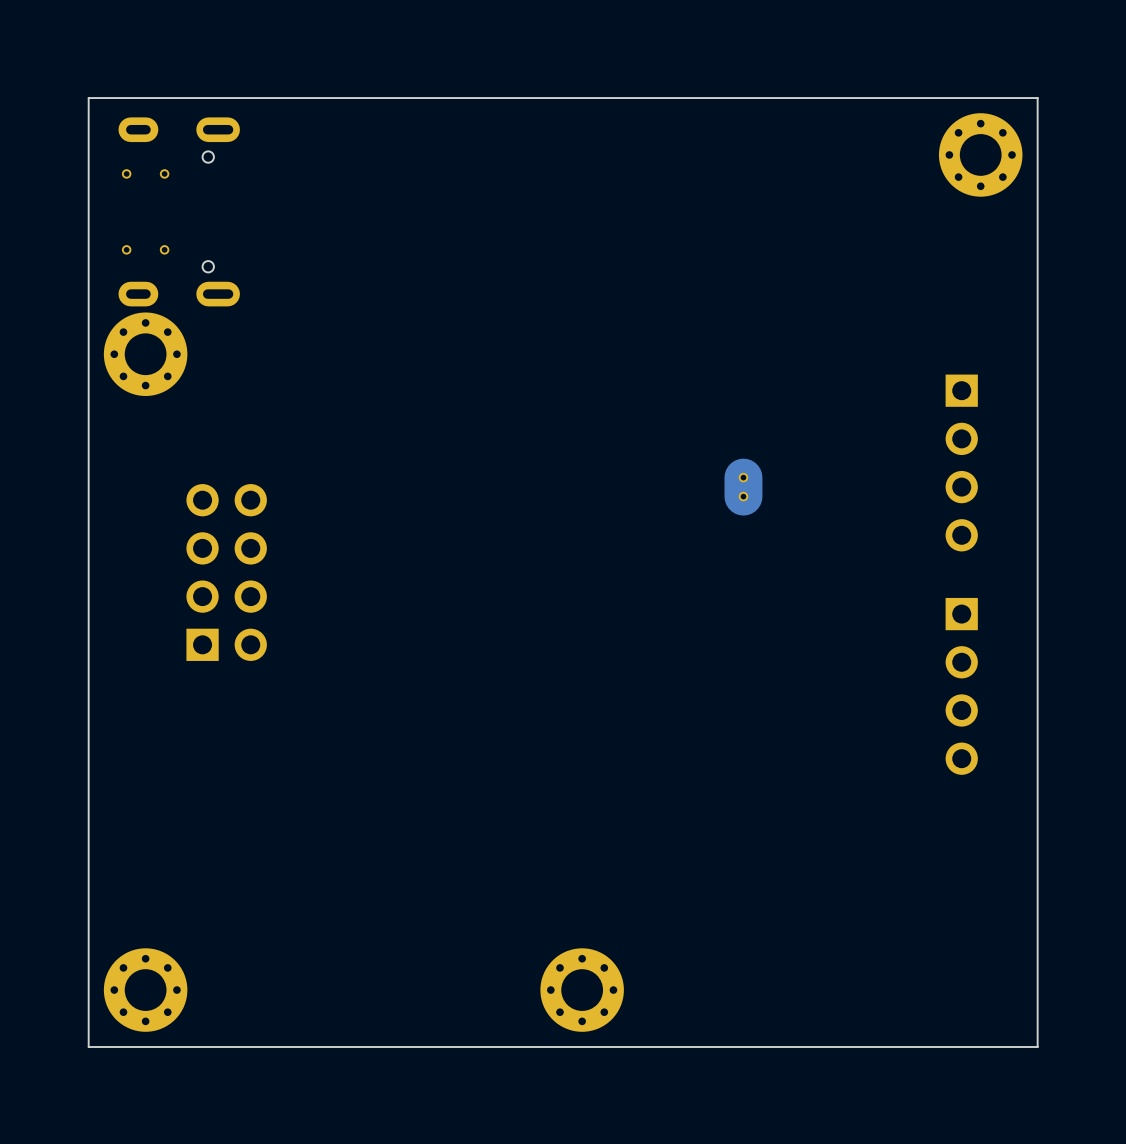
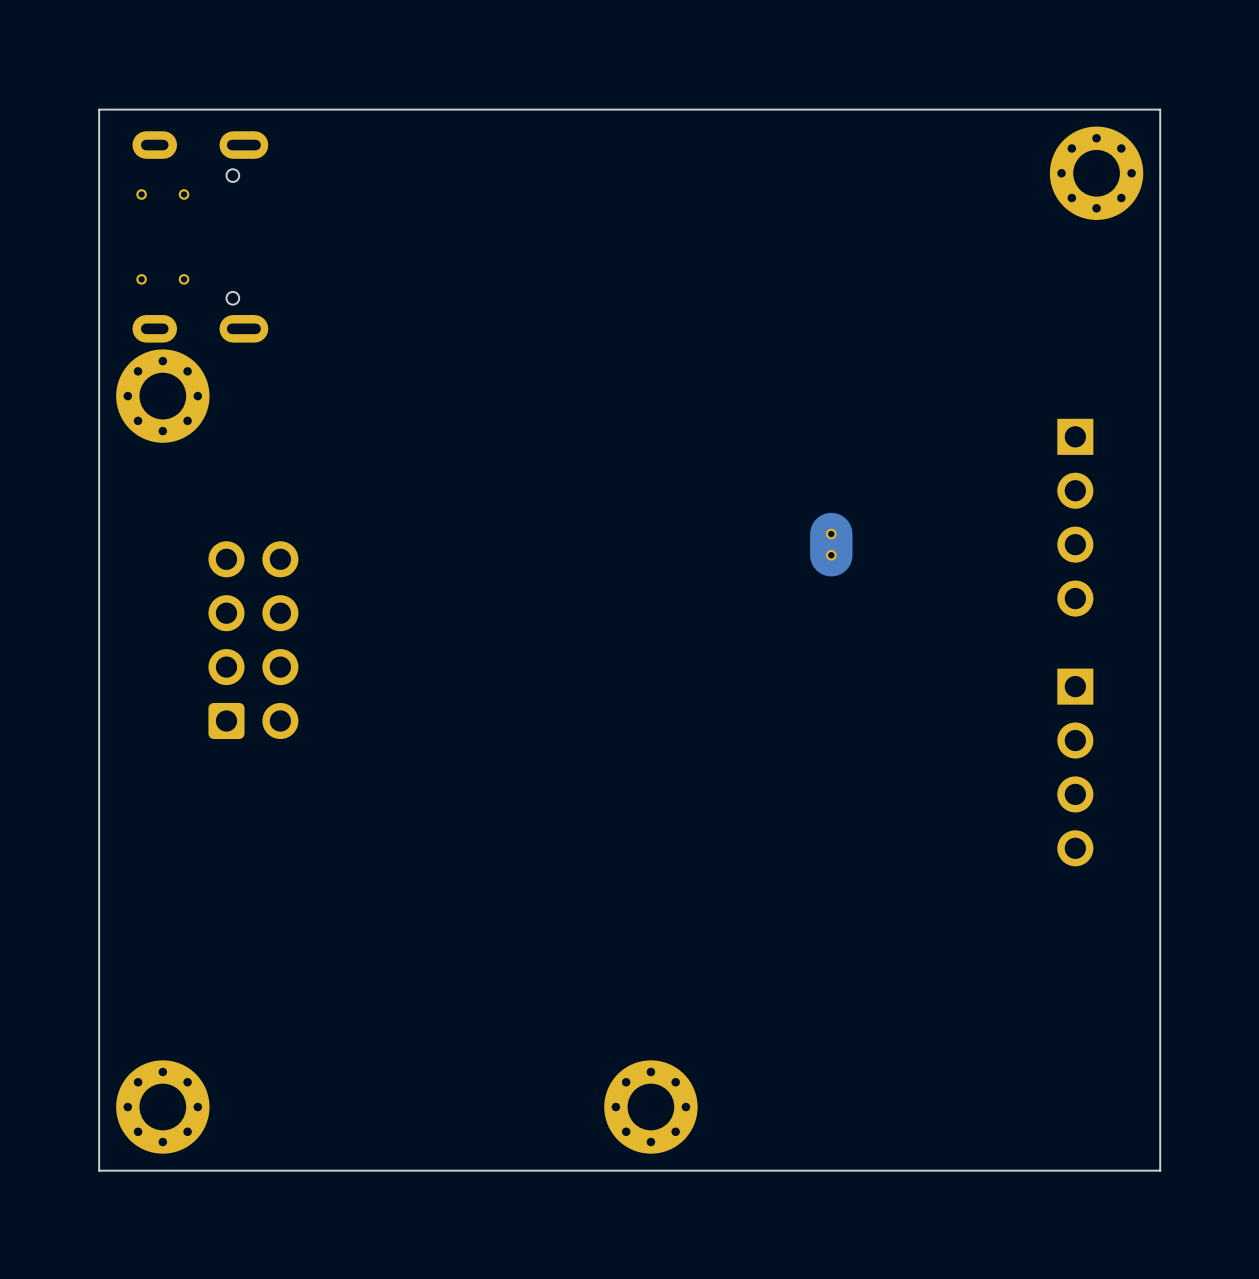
part footprint: [186, 484, 267, 661] -> [208, 541, 299, 740]

